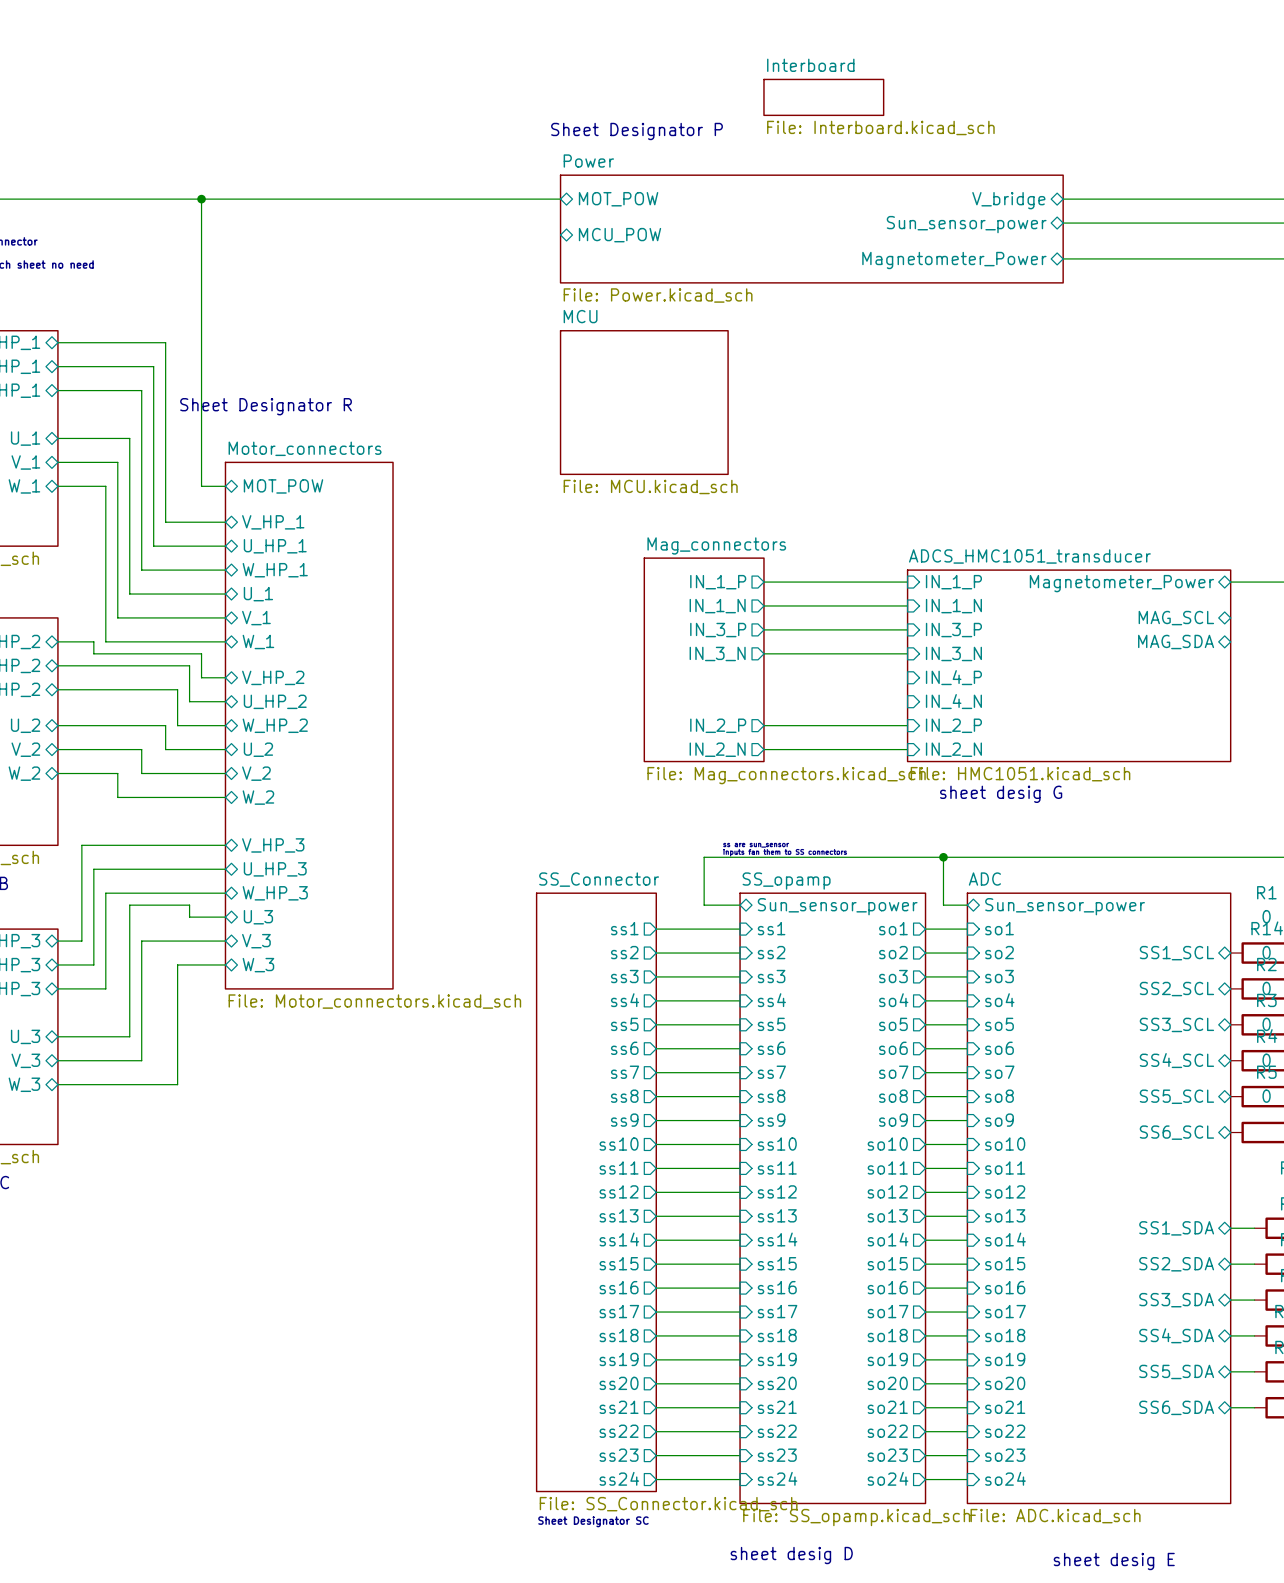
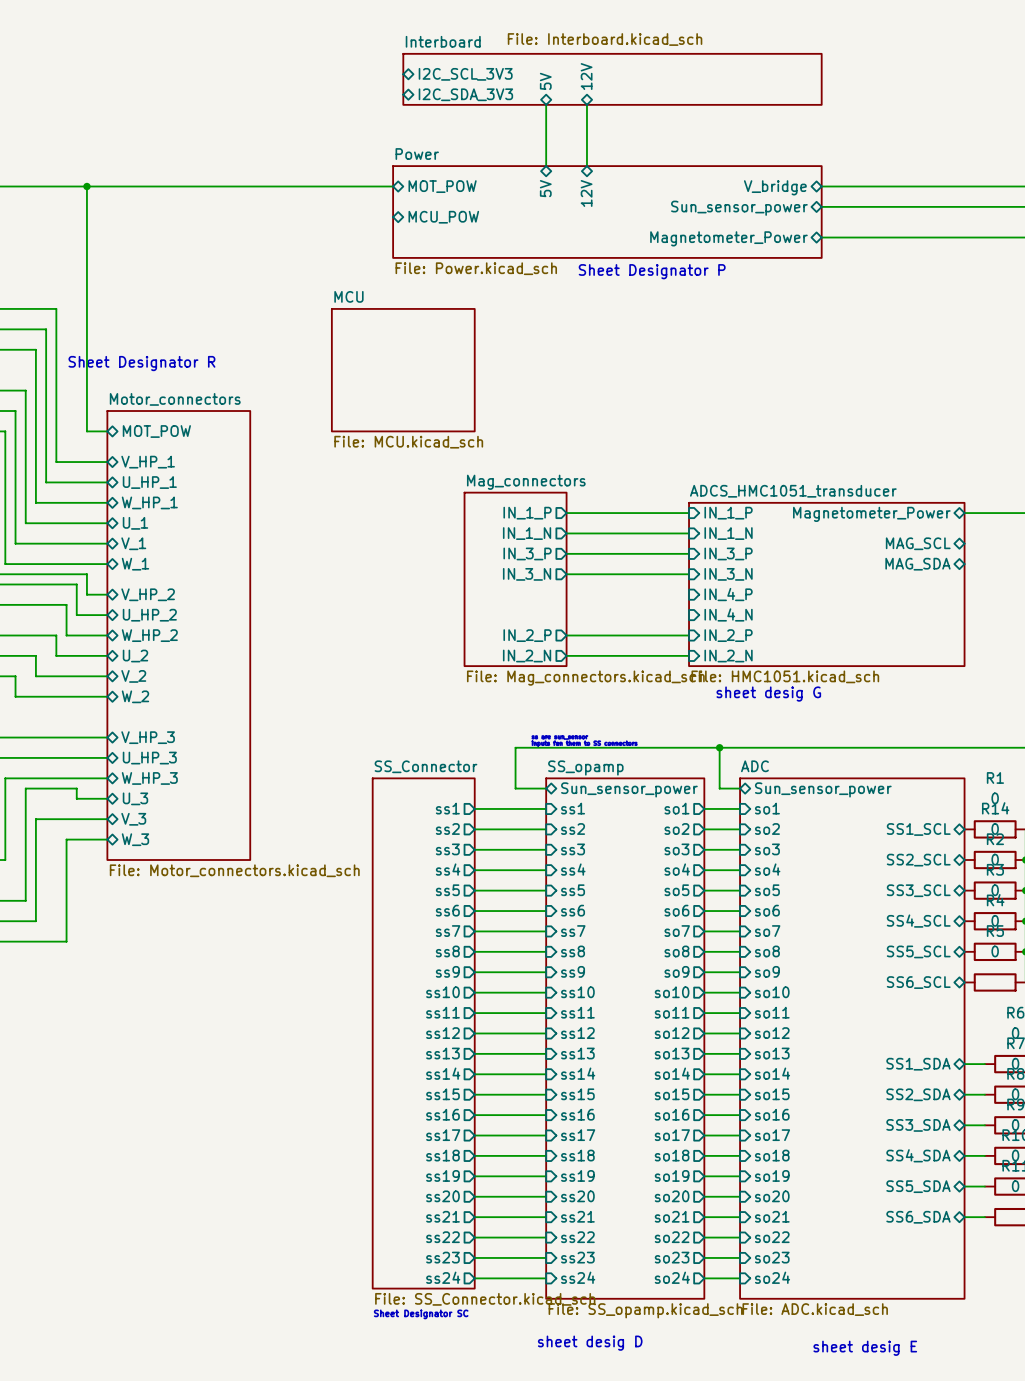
sheet pin: none -> I2C_SCL_3V3 (465, 74)
sheet pin: none -> 12V (586, 76)
sheet Interboard: none -> File: Interboard.kicad_sch (612, 79)
sheet pin: none -> 5V (545, 81)
sheet pin: none -> I2C_SDA_3V3 (465, 94)
sheet Interboard: File: Interboard.kicad_sch (823, 97) -> none
wire: none -> (546, 104) (546, 166)
wire: none -> (586, 104) (586, 166)
text: Sheet Designator P (636, 131) -> none
sheet pin: none -> 5V (545, 188)
sheet pin: none -> 12V (586, 193)
text: none -> Sheet Designator P (652, 271)
sheet MCU position: (644, 402) -> (403, 370)

